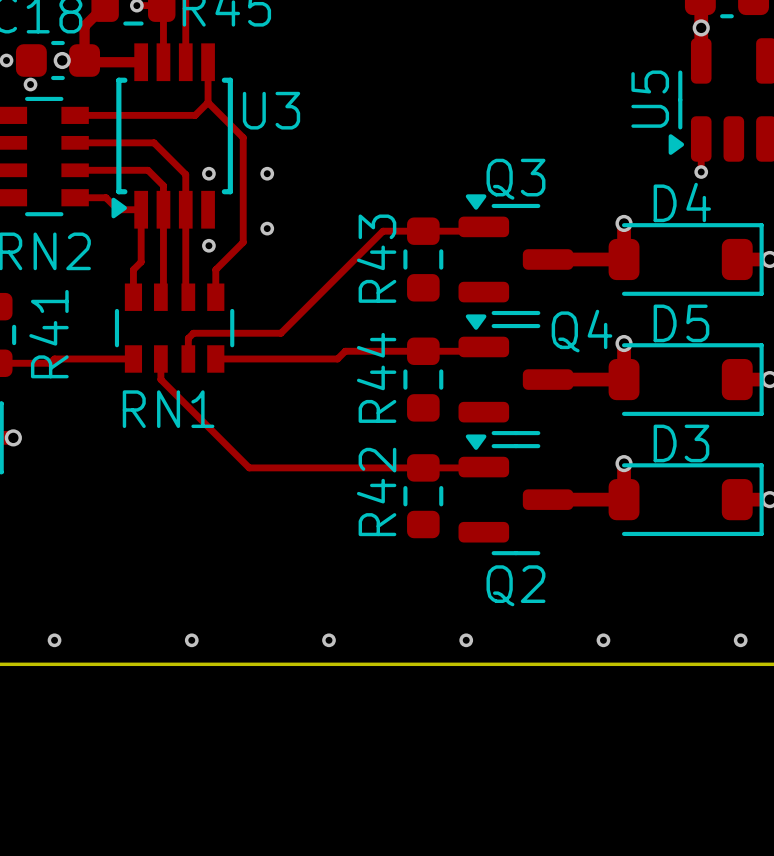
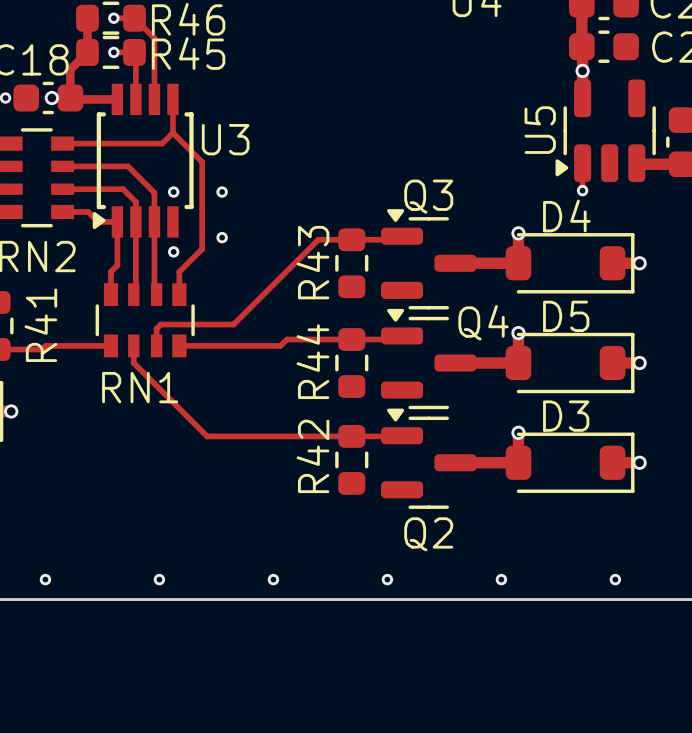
via: (30, 84) -> none

